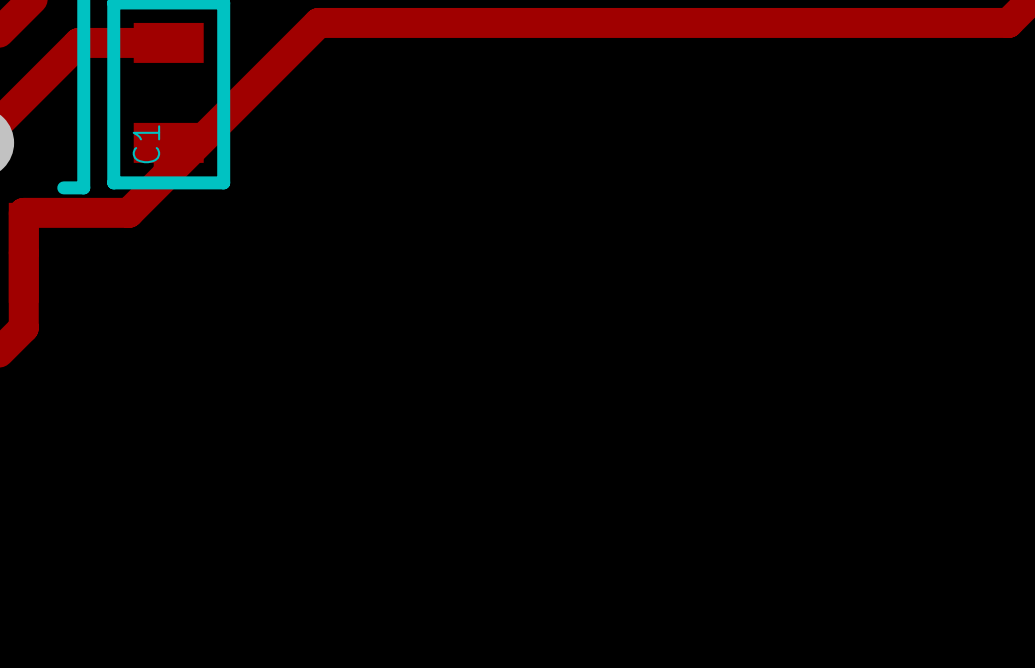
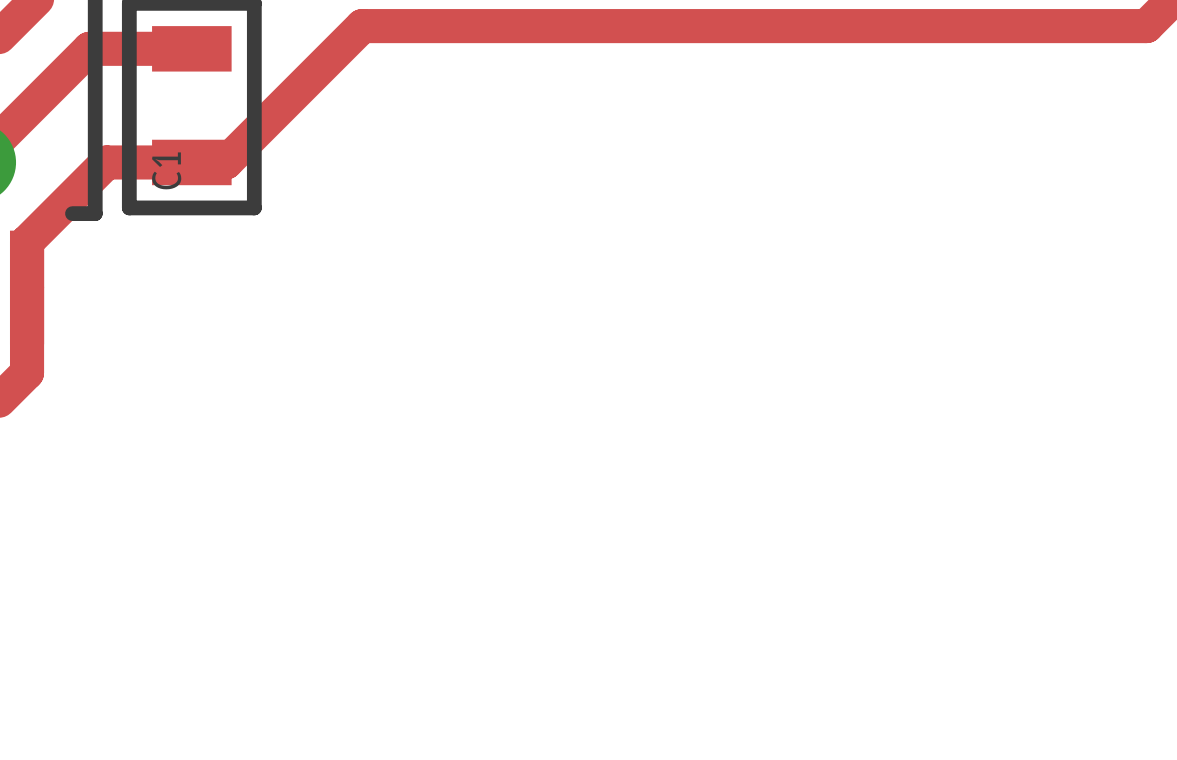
top track: (198, 142) (128, 212) (23, 212) -> (225, 162) (106, 162) (27, 242)

